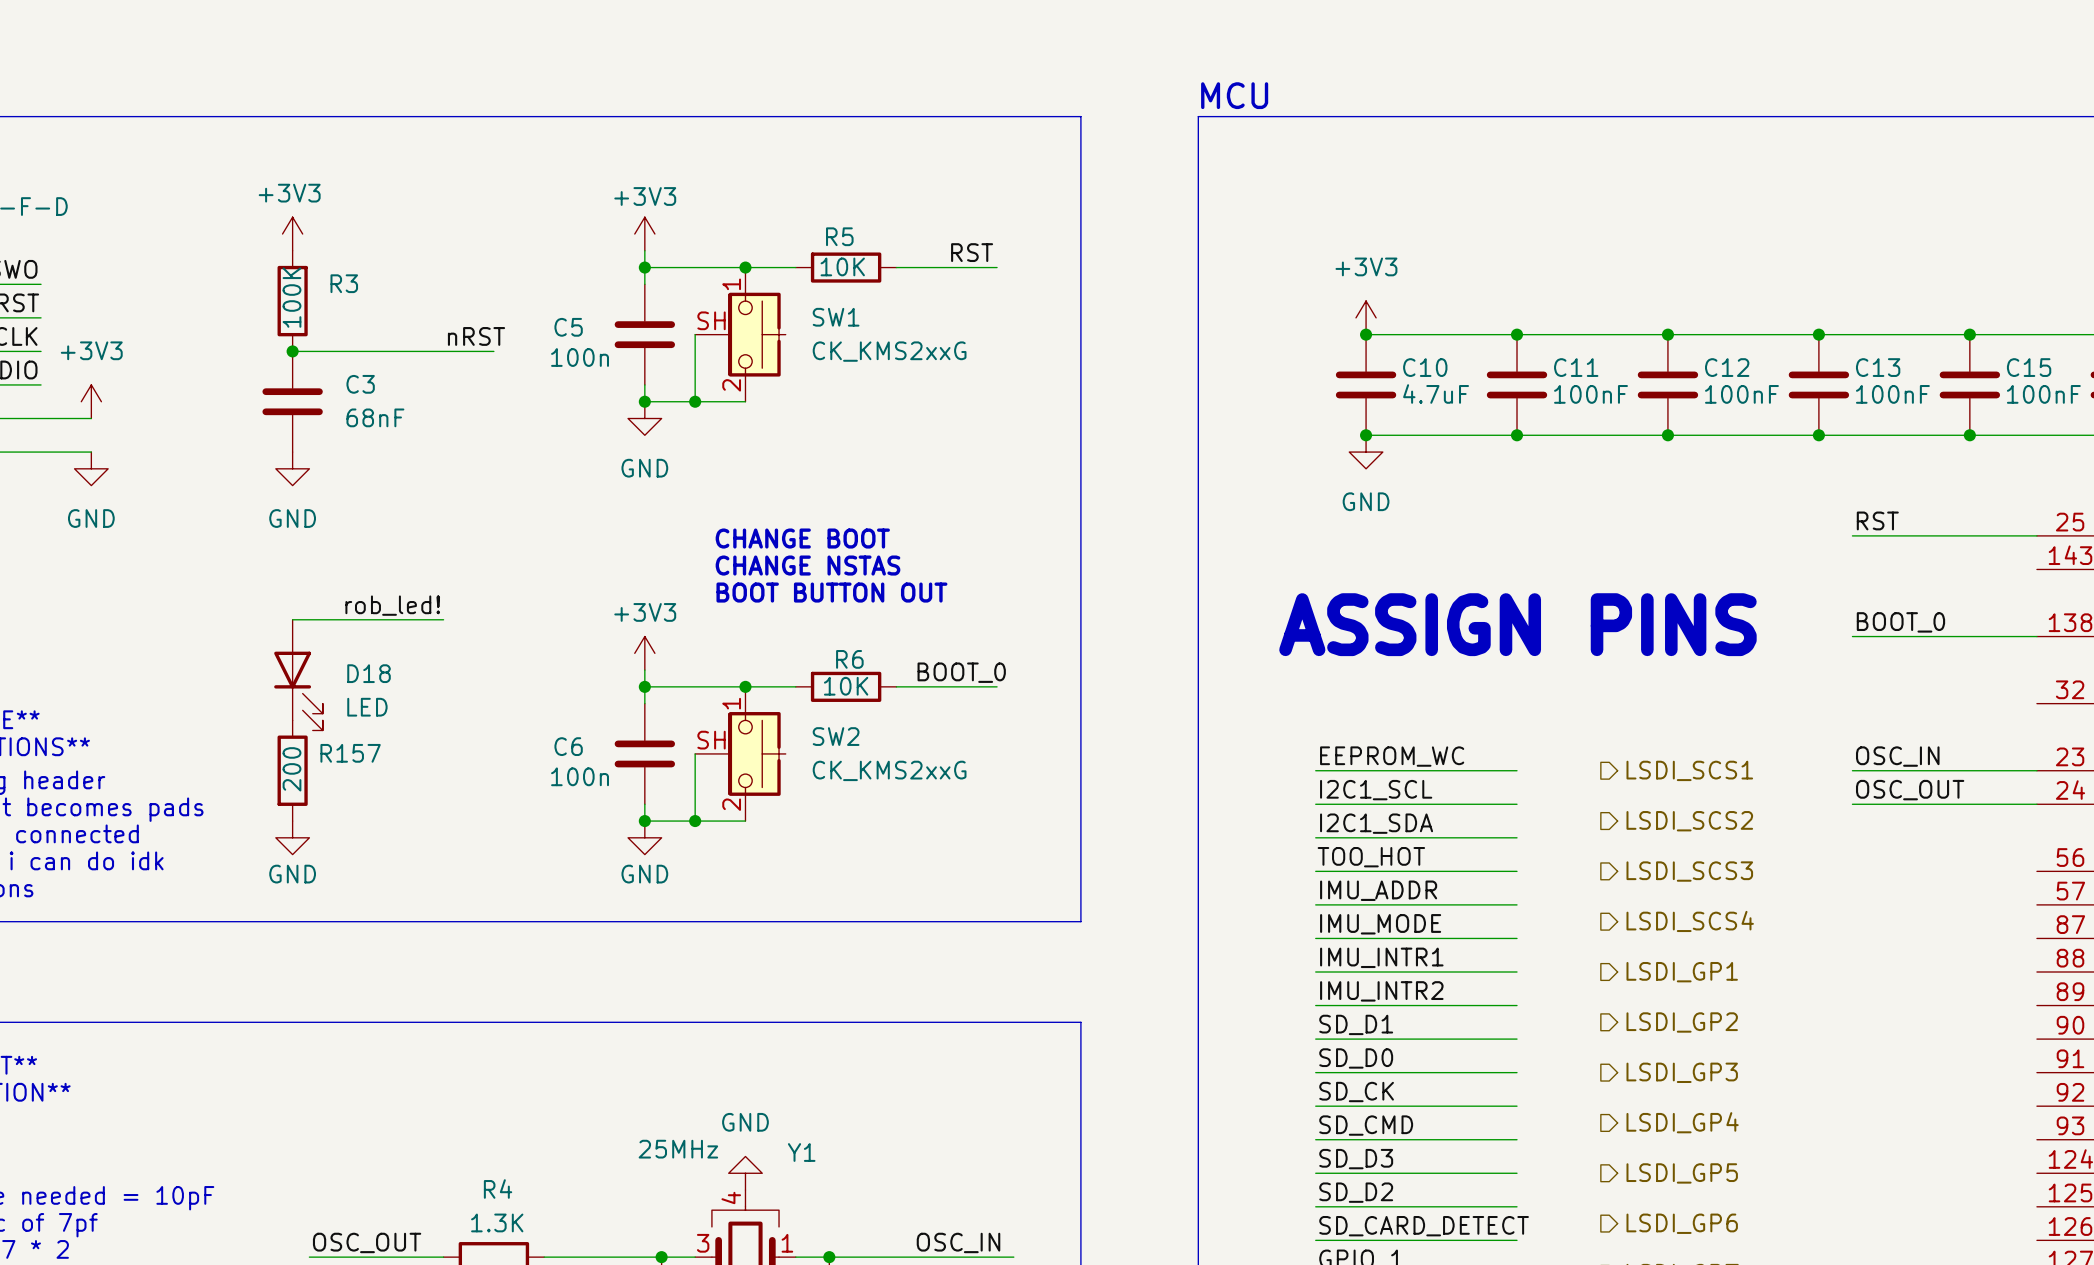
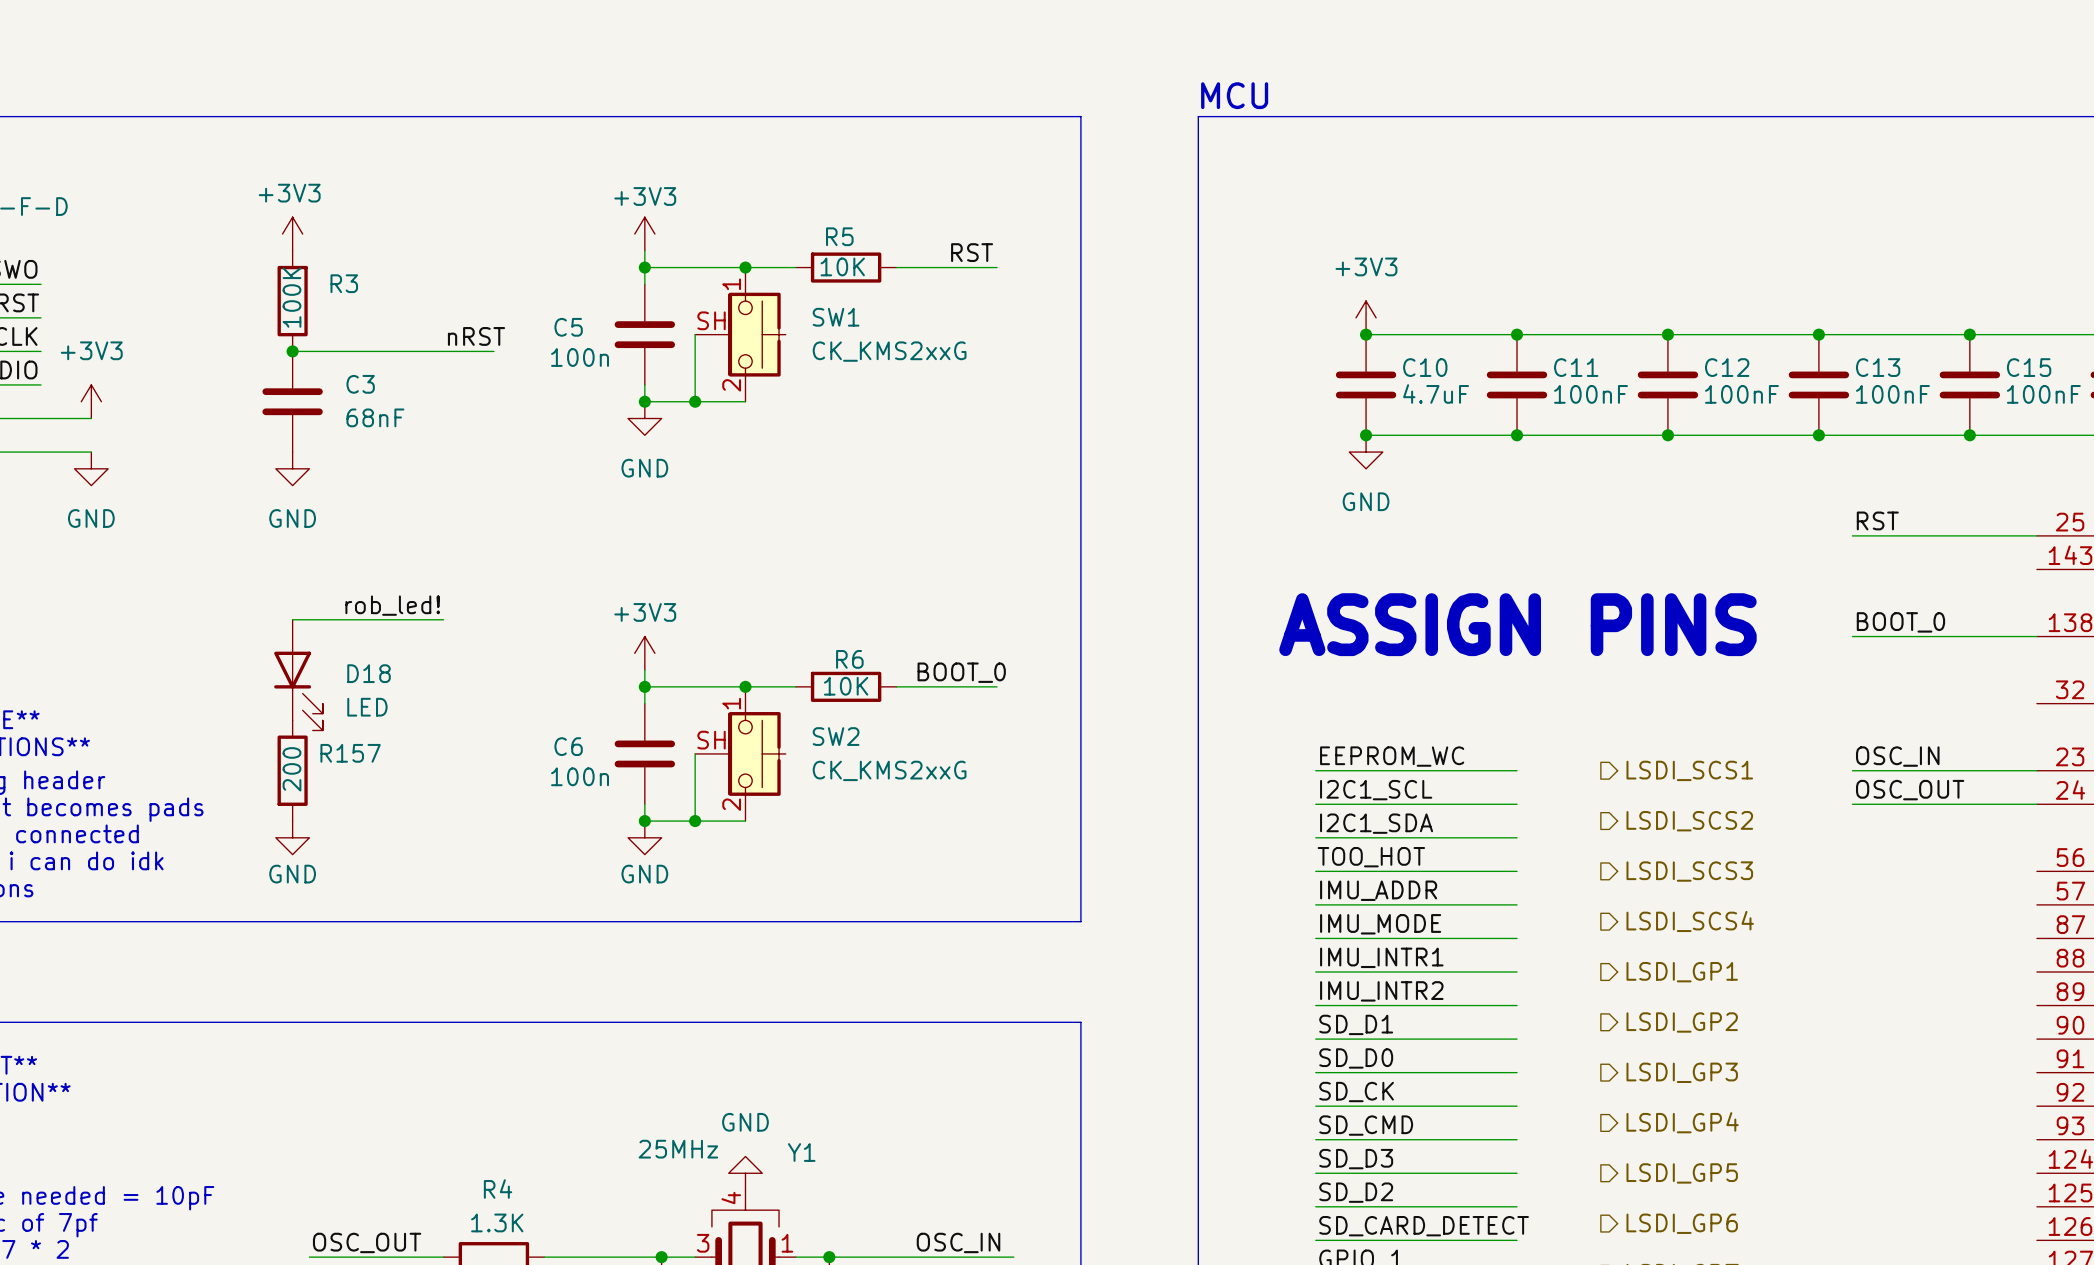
text: CHANGE BOOT (802, 538) -> none
text: CHANGE NSTAS (807, 565) -> none
text: BOOT BUTTON OUT (831, 592) -> none

